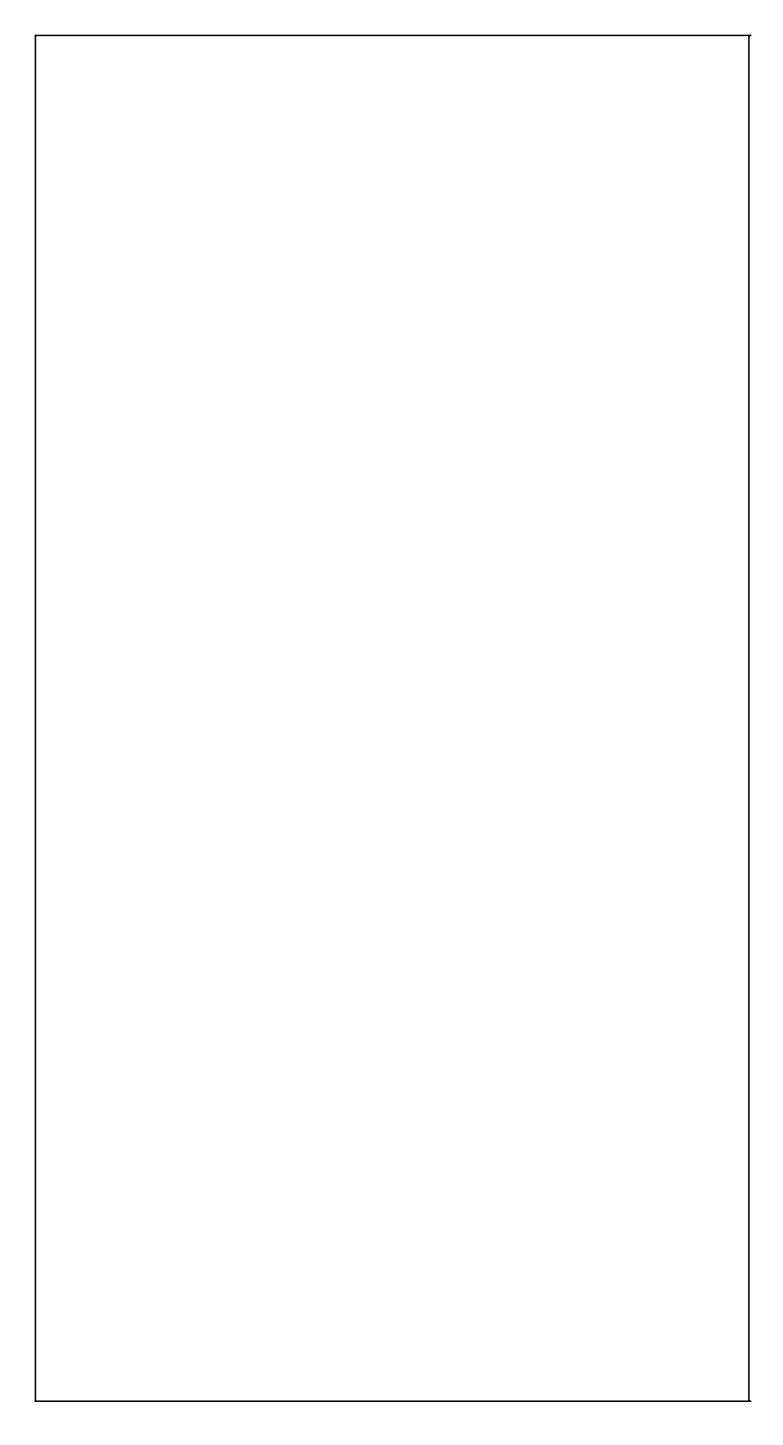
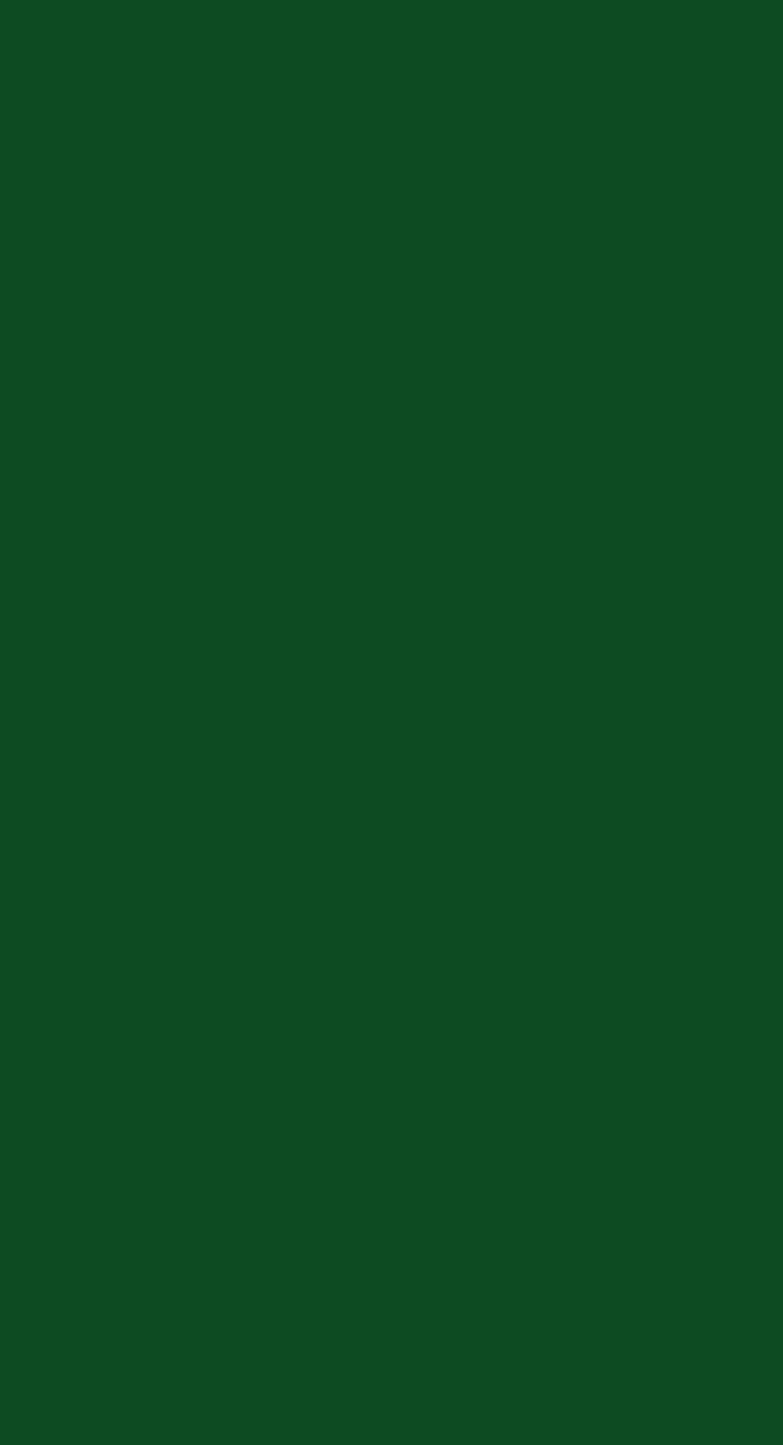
board edge: (748, 35) (748, 1401) -> none
board edge: (750, 35) (35, 35) (35, 1401) (750, 1401) -> none

